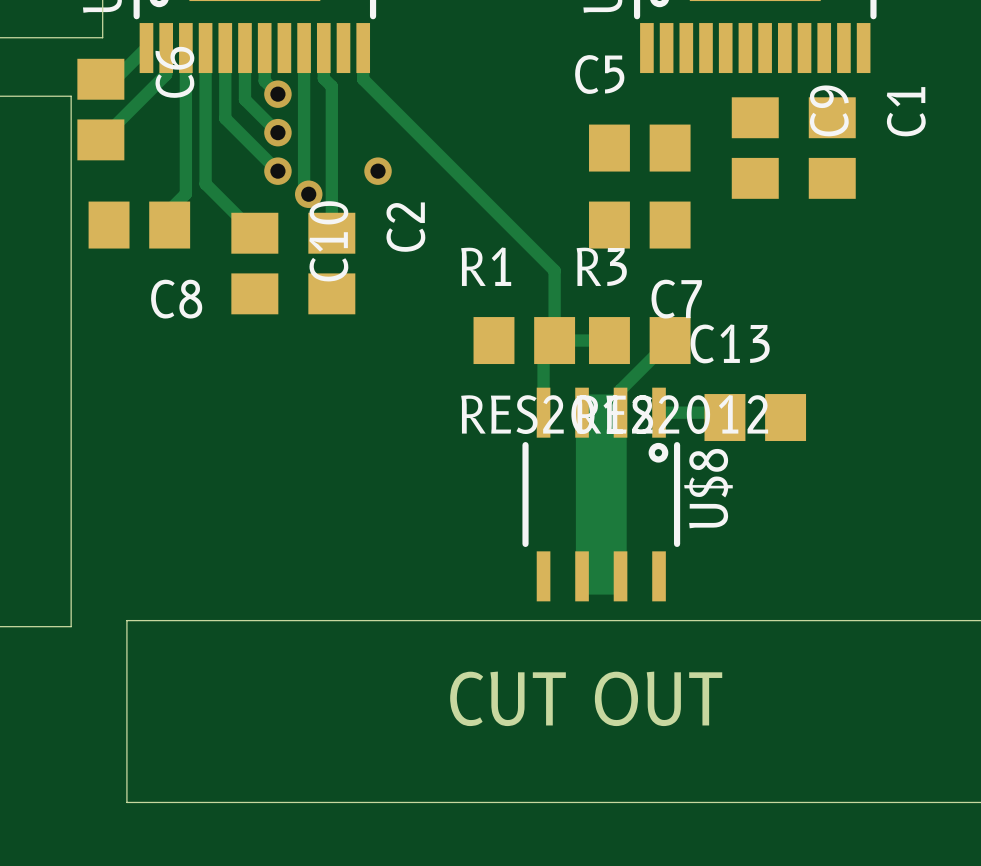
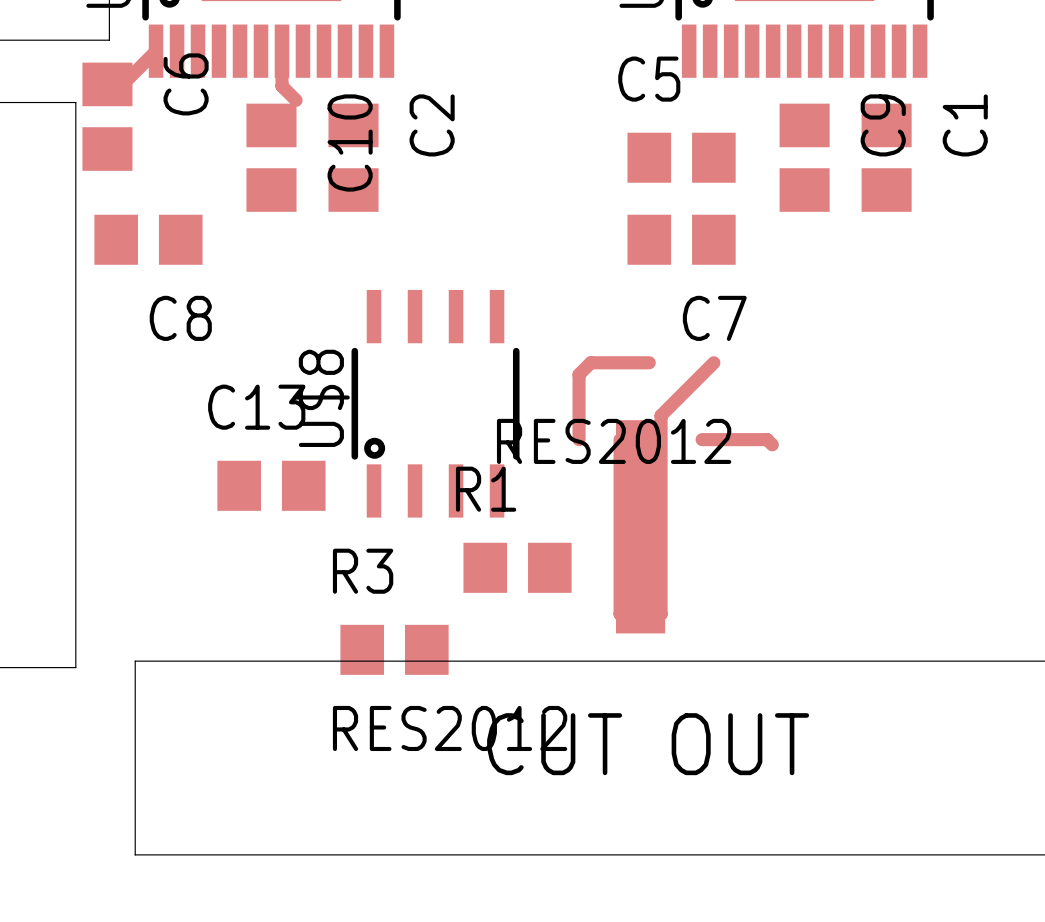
track: (166, 48) (166, 74) (100, 139) -> none
track: (185, 48) (185, 193) (169, 210) (169, 225) -> none
track: (205, 48) (205, 183) (254, 233) -> none
track: (225, 48) (225, 118) (277, 171) -> none
track: (244, 48) (244, 99) (277, 132) -> none
track: (304, 48) (304, 189) (308, 194) -> none
track: (323, 48) (323, 78) (331, 86) (331, 233) -> none
track: (363, 48) (363, 79) (554, 270) (554, 340) -> none
via: (277, 94) -> none
via: (277, 132) -> none
via: (277, 171) -> none
via: (378, 171) -> none
via: (308, 194) -> none
C10 position: (254, 263) -> (271, 157)
C2 position: (331, 263) -> (353, 157)
R1 position: (524, 340) -> (517, 567)
R3 position: (639, 340) -> (394, 649)
C13 position: (755, 417) -> (271, 485)
U$8 rotation: 0° (601, 494) -> 180° (435, 403)
U$8 position: (601, 494) -> (435, 403)

